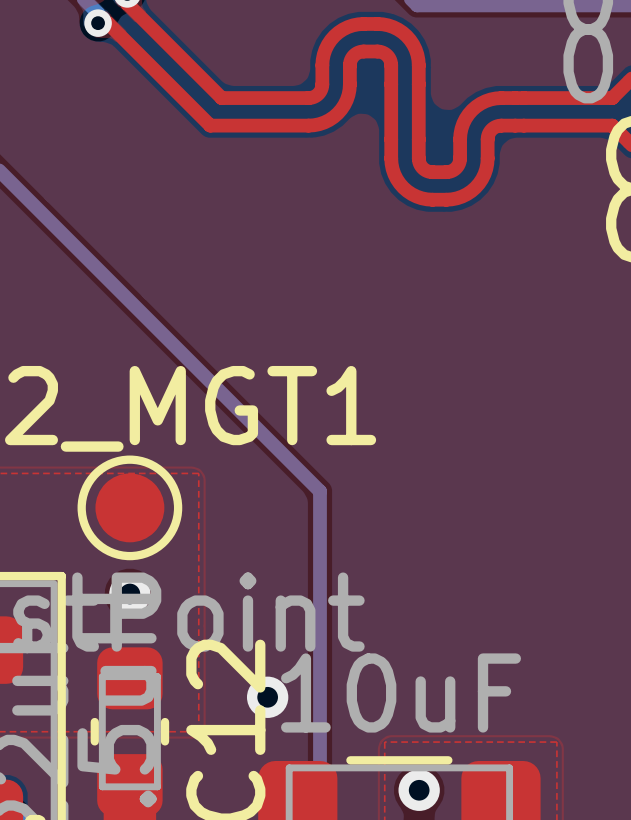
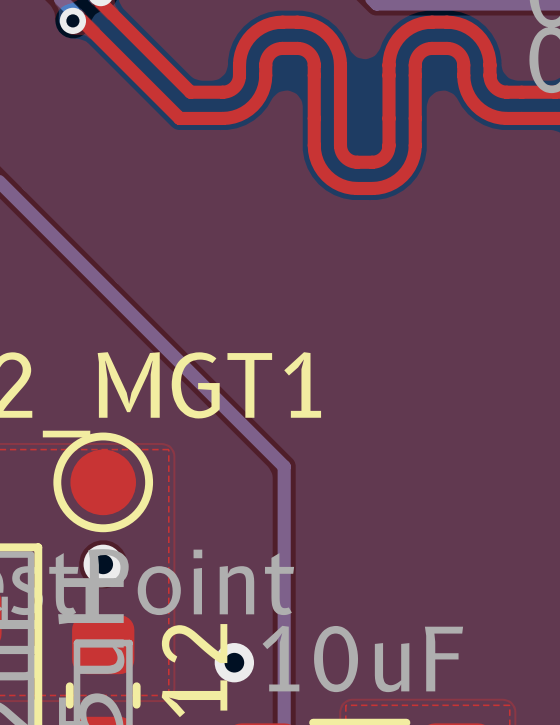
top track: (255, 98) (308, 98) (315, 96) (321, 87) (323, 54) (334, 36) (347, 27) (358, 24) (382, 24) (393, 27) (410, 40) (417, 54) (418, 160) (422, 168) (432, 172) (449, 171) (457, 166) (459, 160) (460, 133) (463, 123) (472, 110) (480, 103) (496, 98) (553, 98) -> (222, 92) (231, 89) (238, 81) (240, 54) (248, 39) (261, 27) (282, 22) (303, 22) (313, 25) (327, 34) (334, 43) (340, 65) (340, 147) (343, 155) (352, 161) (376, 161) (384, 157) (387, 151) (390, 54) (401, 34) (415, 25) (426, 22) (452, 22) (473, 31) (486, 48) (492, 83) (498, 89) (506, 92)
top track: (255, 125) (313, 125) (329, 120) (341, 109) (346, 100) (349, 89) (350, 63) (352, 56) (361, 51) (382, 52) (388, 56) (391, 63) (392, 169) (396, 179) (407, 191) (421, 198) (432, 199) (451, 199) (462, 196) (479, 183) (487, 163) (488, 135) (494, 127) (501, 125) (553, 125) -> (222, 118) (239, 115) (256, 101) (264, 86) (267, 58) (272, 51) (282, 48) (303, 49) (312, 58) (315, 156) (326, 175) (346, 187) (383, 187) (398, 179) (409, 166) (415, 145) (415, 63) (418, 54) (425, 49) (449, 48) (457, 51) (463, 60) (465, 86) (472, 101) (485, 112) (506, 118)

